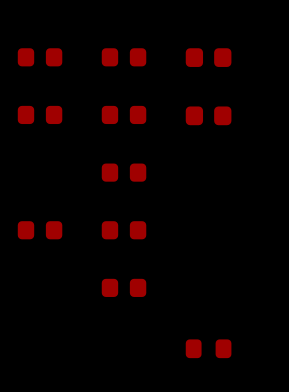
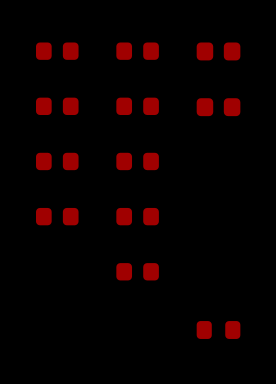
part: none -> (57, 161)

